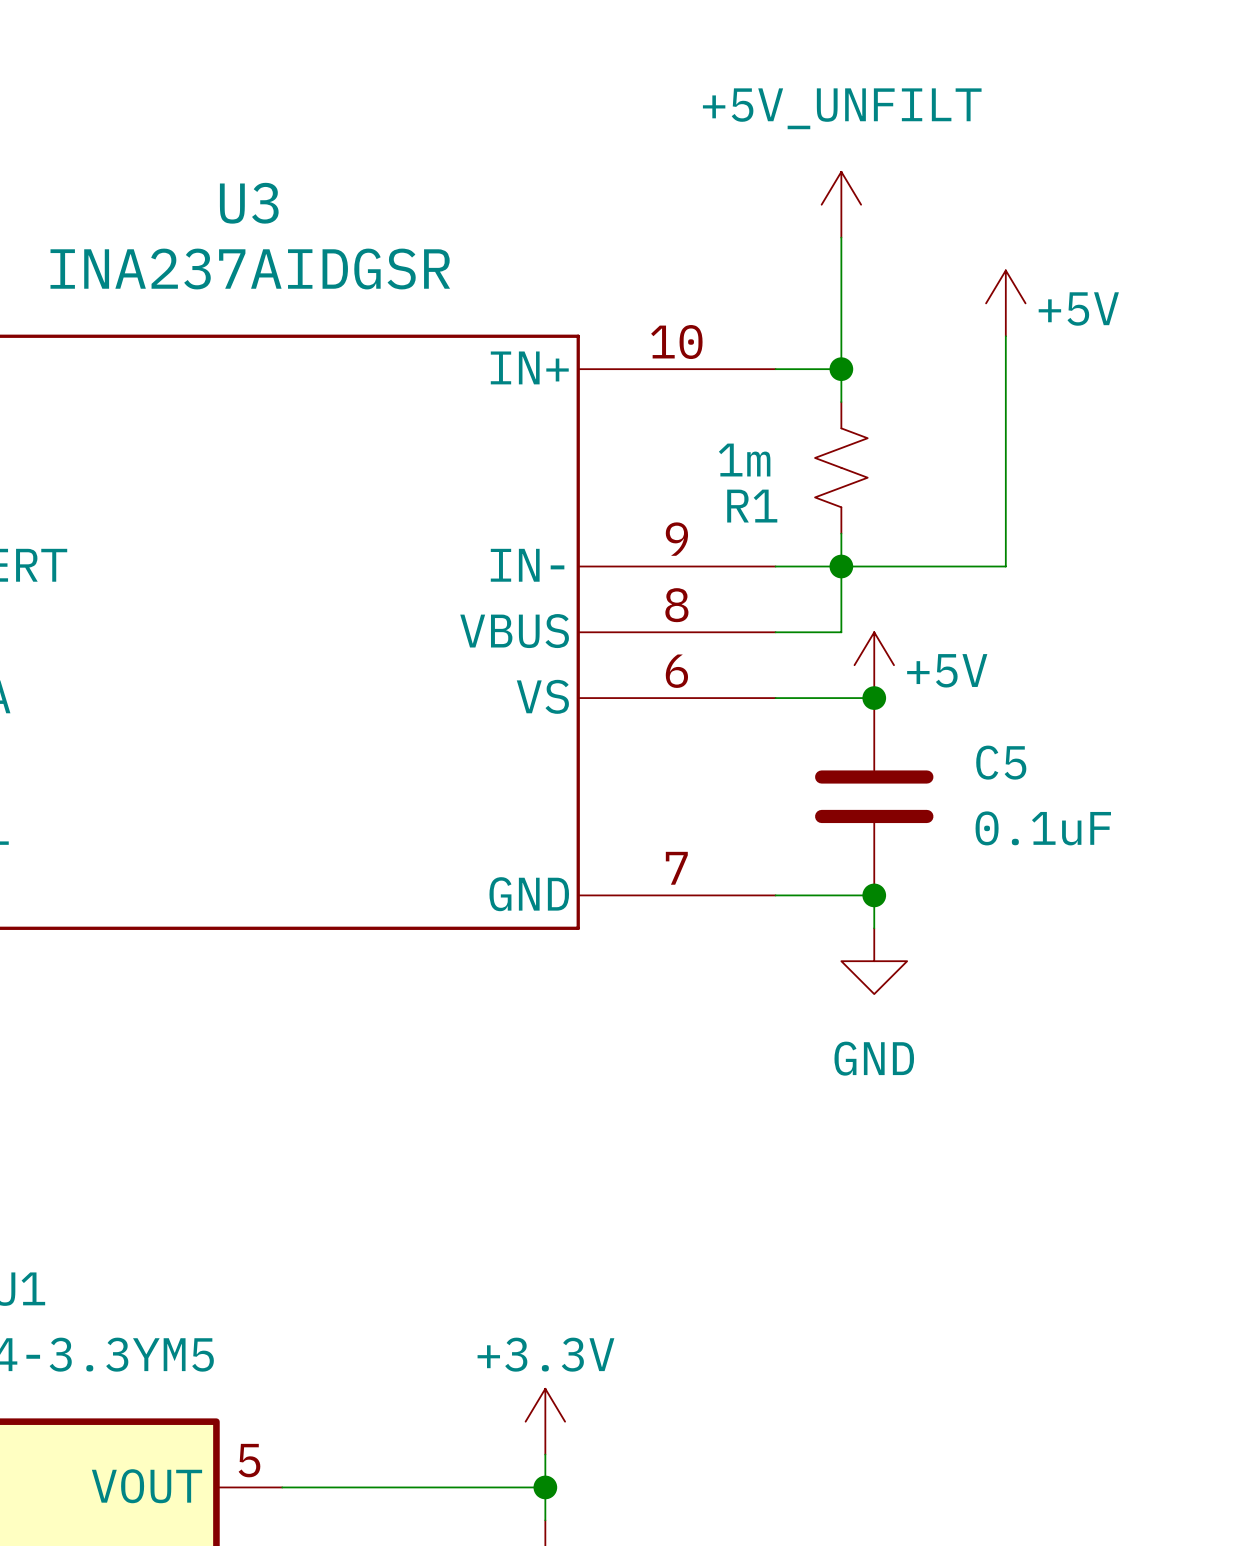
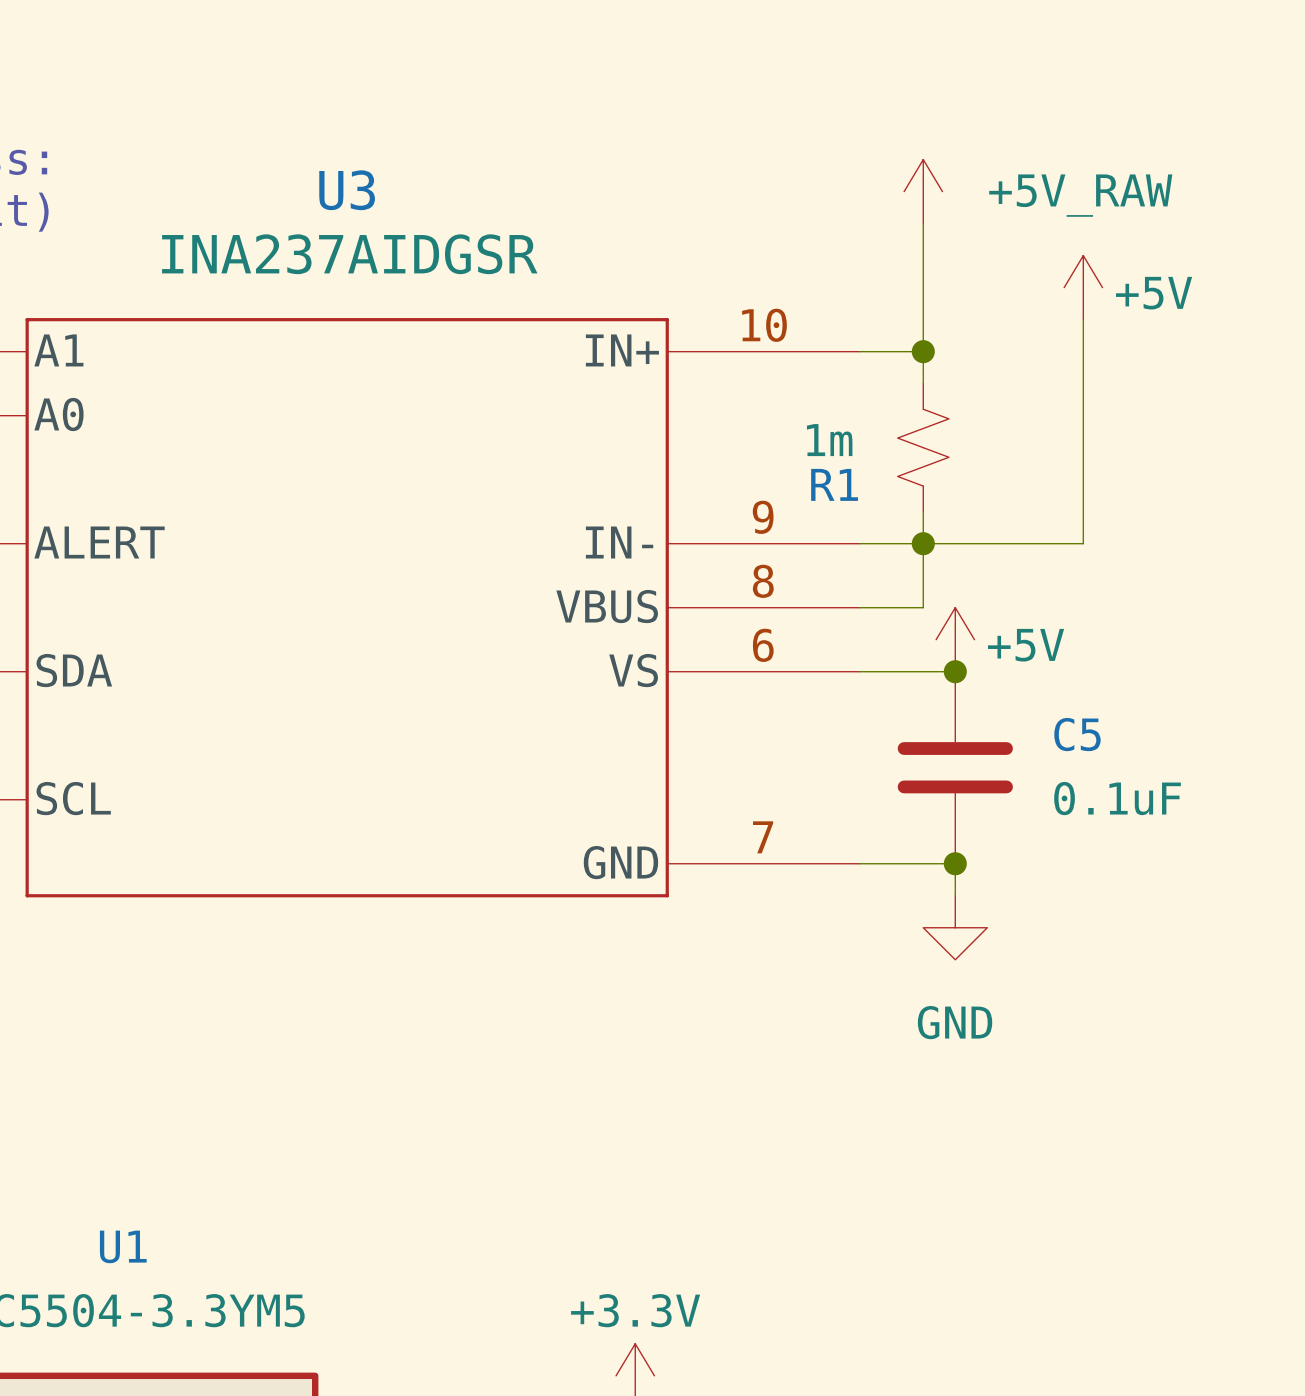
power symbol: +5V_UNFILT (841, 204) -> +5V_RAW (923, 191)

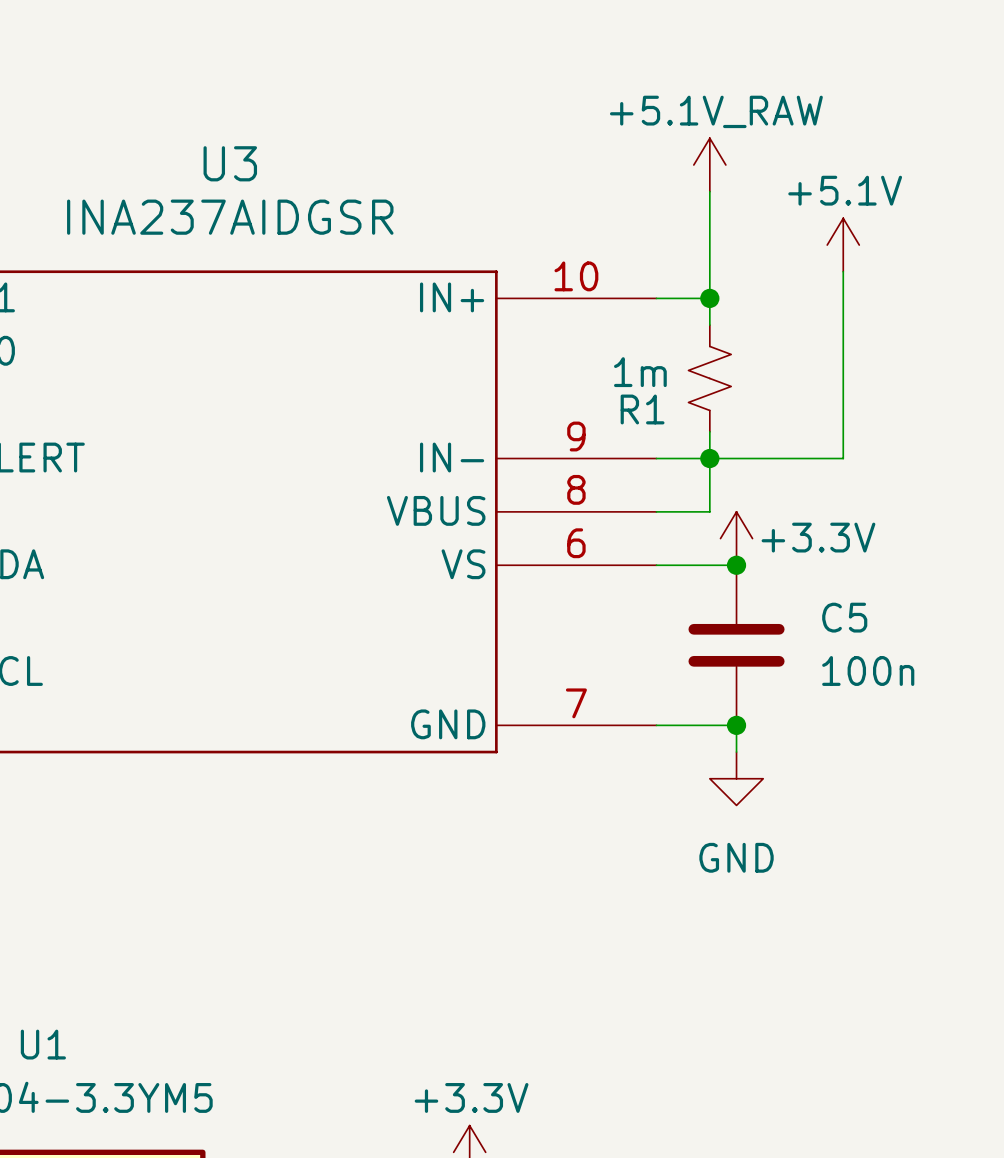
power symbol: +5V_RAW (923, 191) -> +5.1V_RAW (709, 164)
power symbol: +5V (1083, 287) -> +5.1V (843, 245)
power symbol: +5V (955, 639) -> +3.3V (736, 538)
C5 value: 0.1uF (1117, 798) -> 100n (868, 671)

